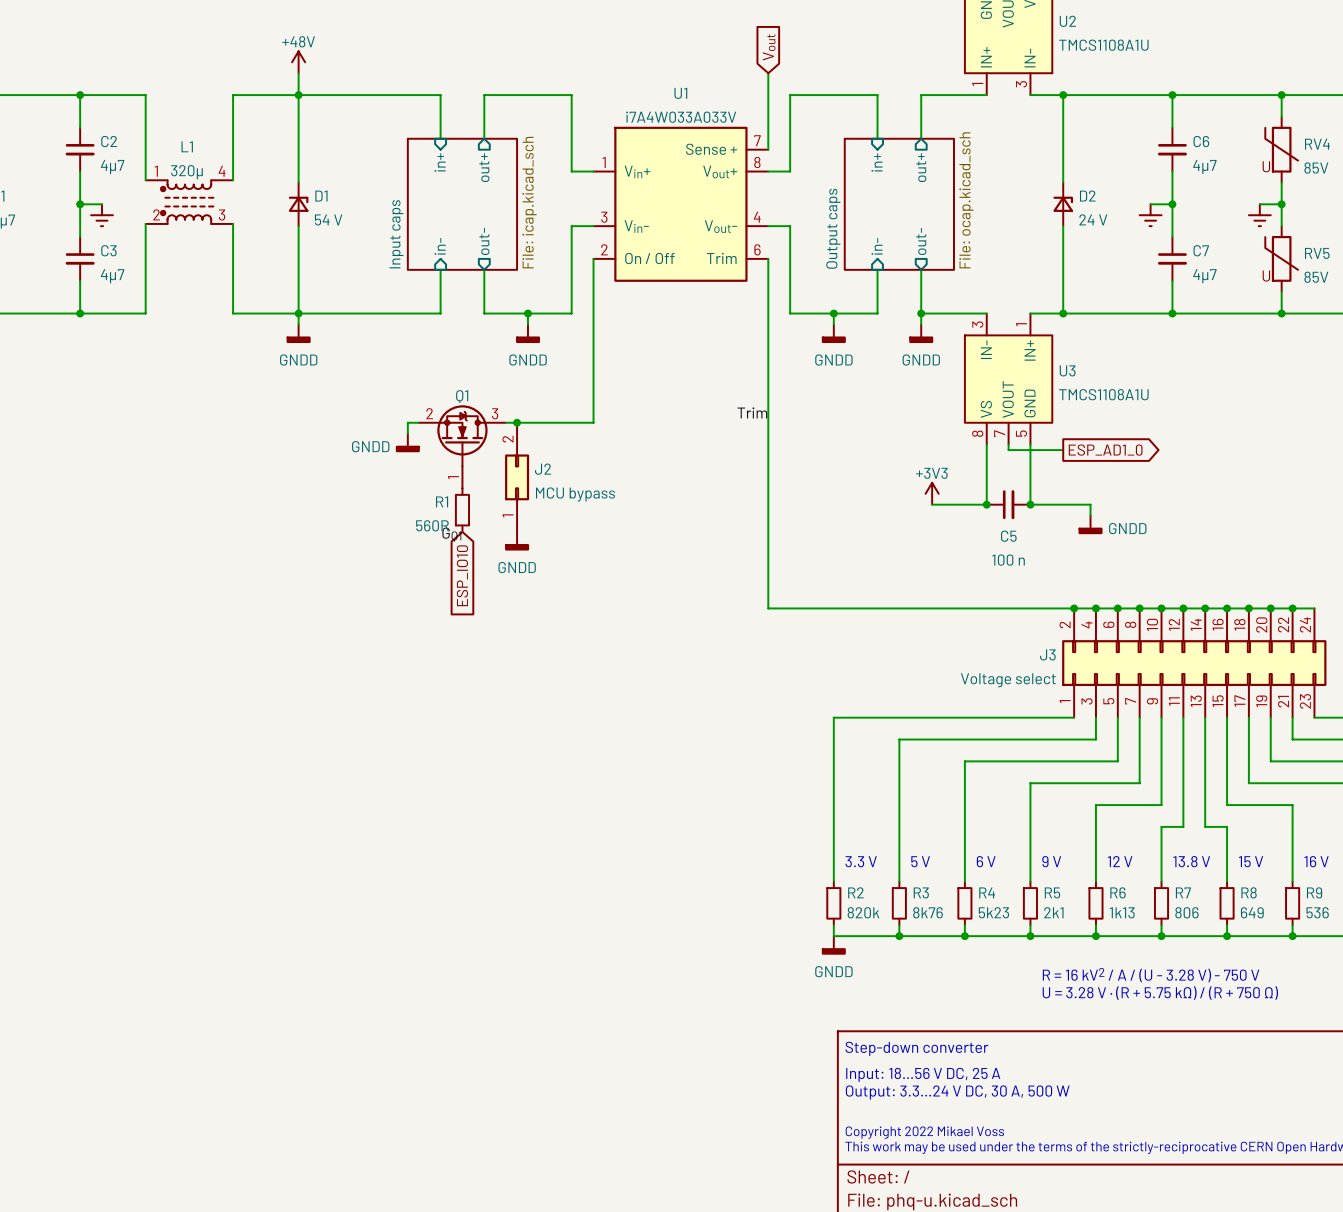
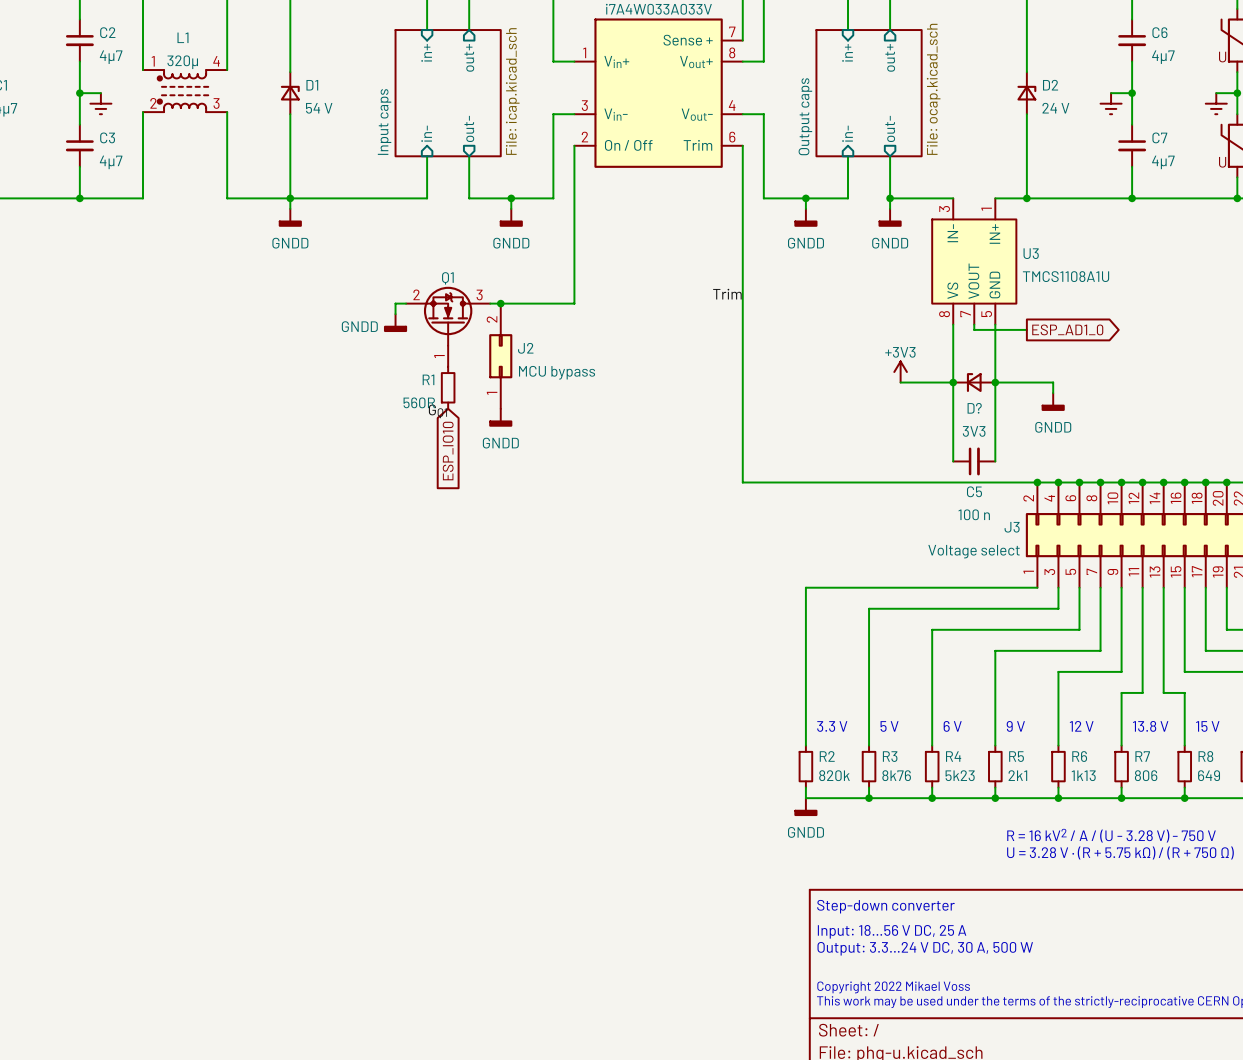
wire: none -> (953, 382) (953, 461)
C5 position: (1008, 504) -> (974, 461)
D?: none -> 3V3 (974, 382)
wire: none -> (995, 382) (995, 461)
power symbol text position: GNDD (1127, 528) -> GNDD (1053, 427)

